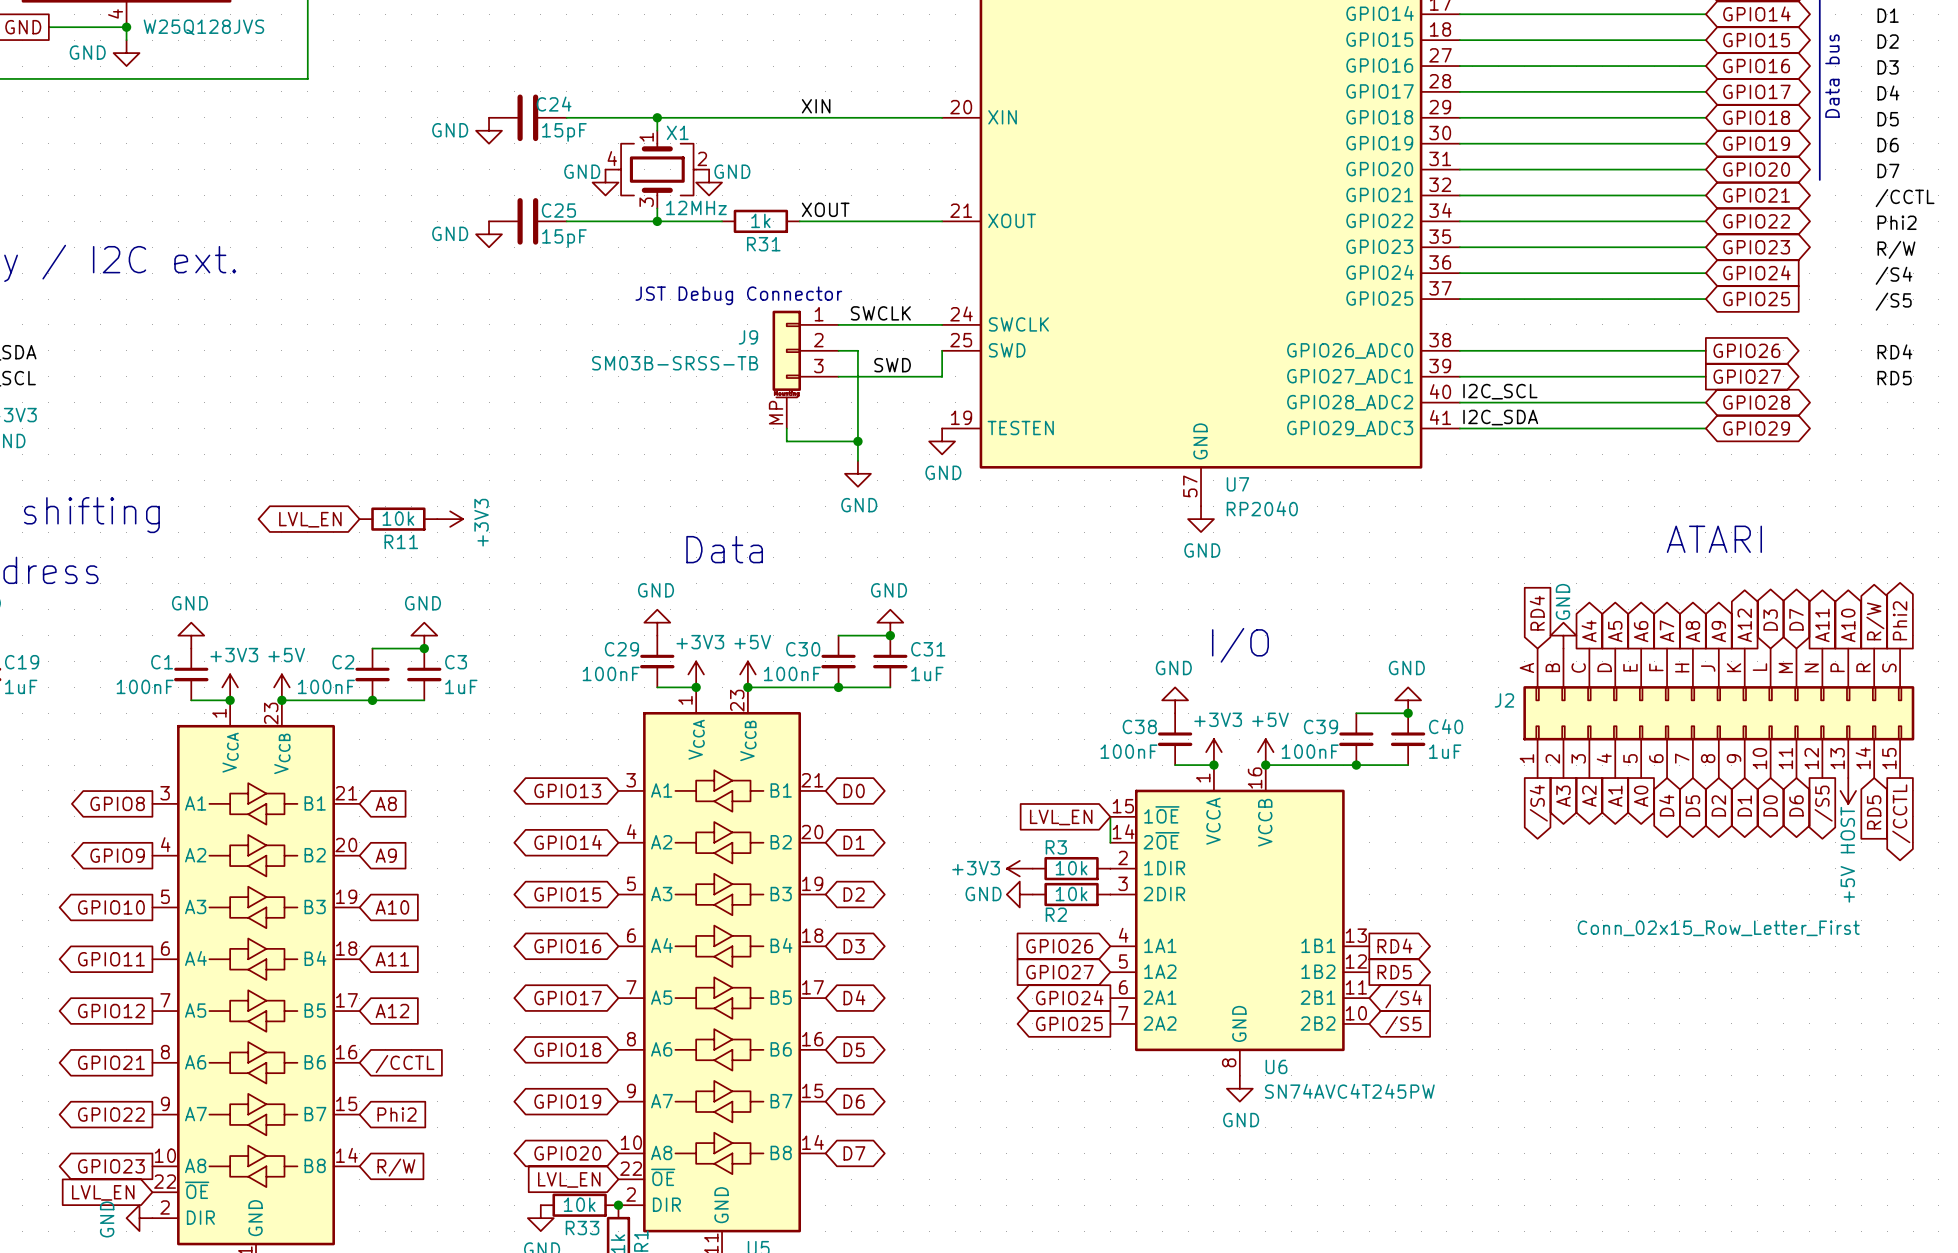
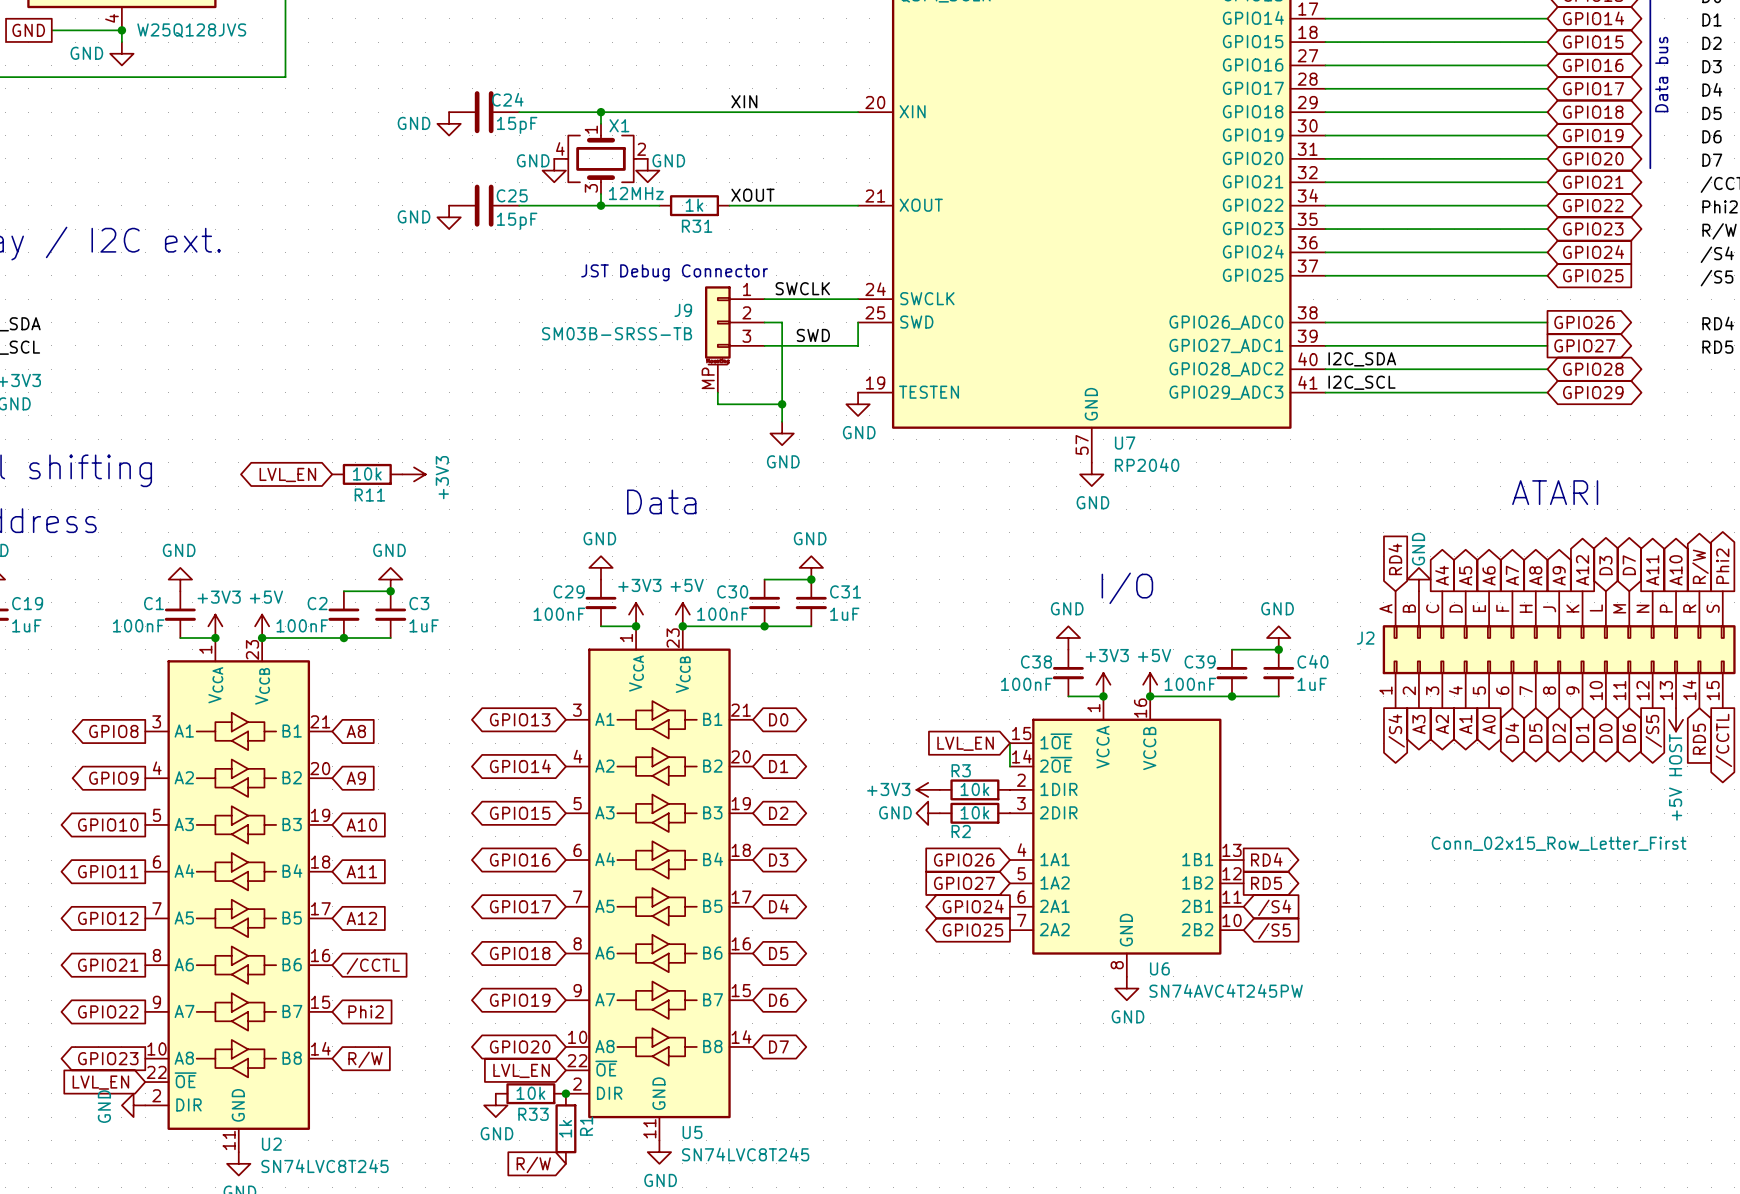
label: I2C_SCL (1500, 391) -> I2C_SDA (1362, 359)
label: I2C_SDA (1500, 417) -> I2C_SCL (1362, 382)

